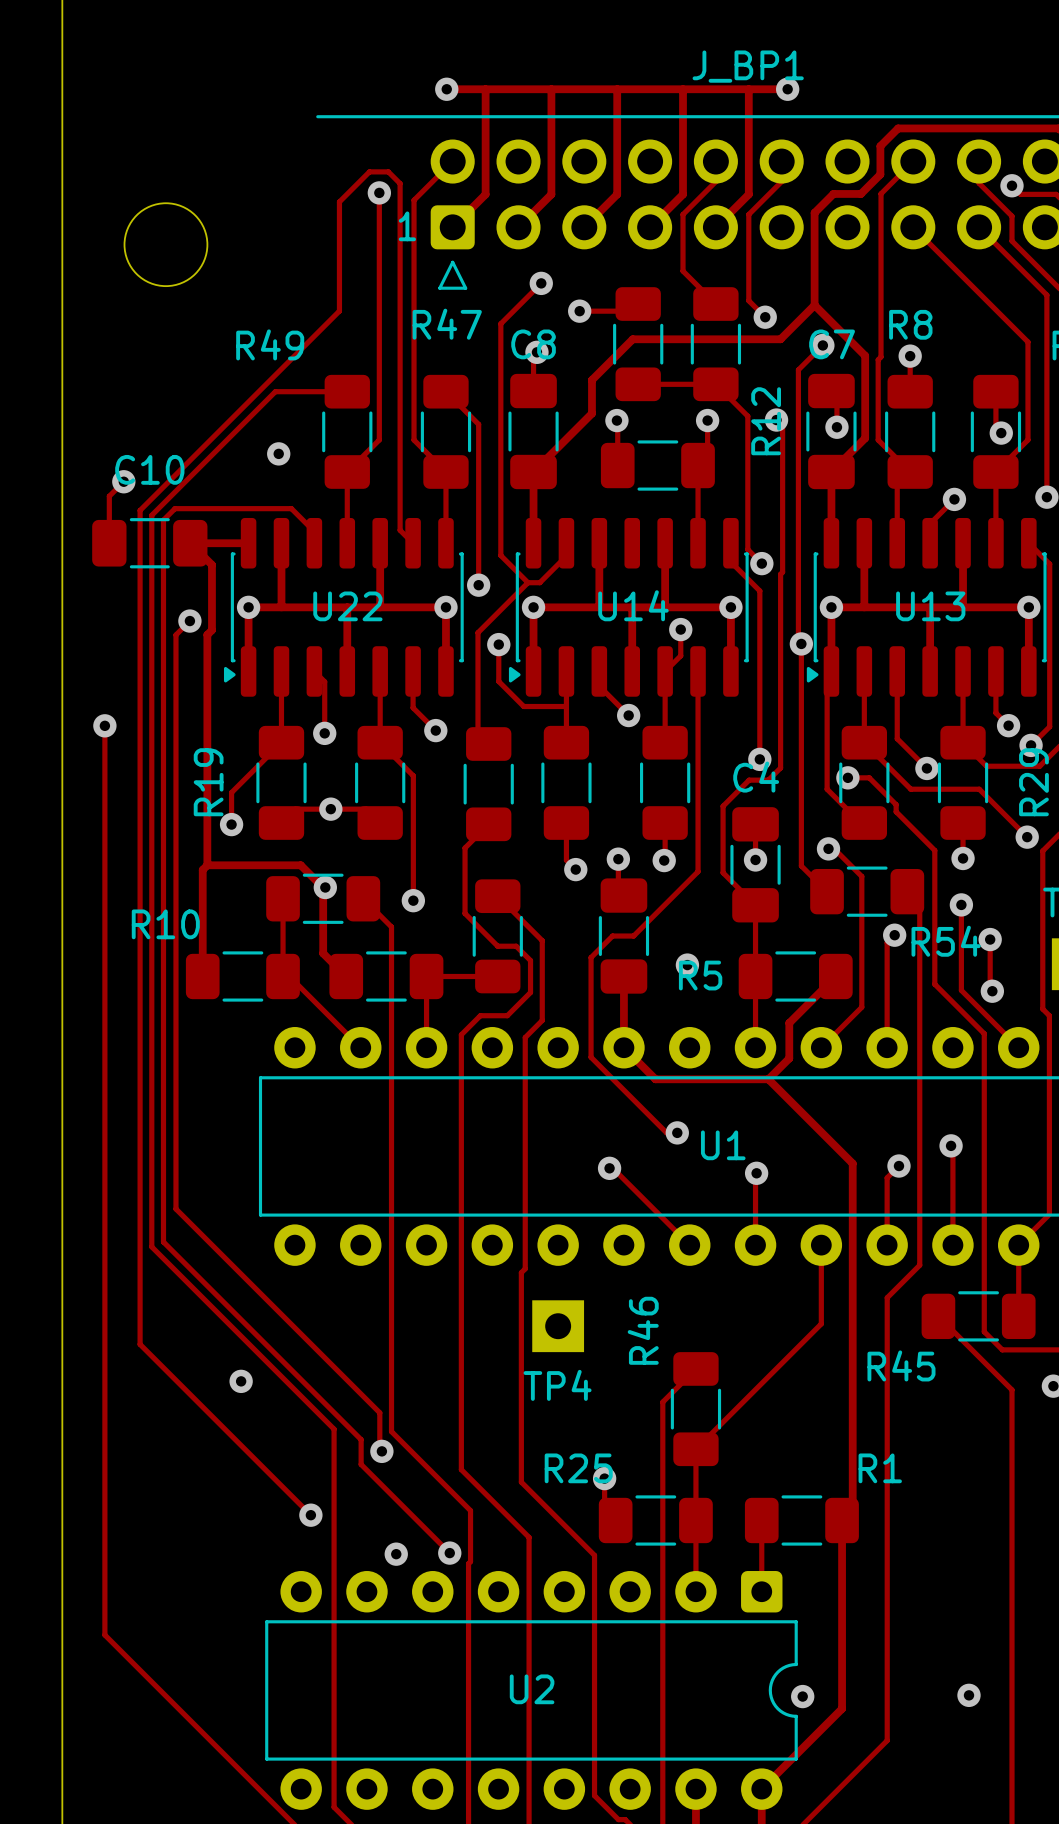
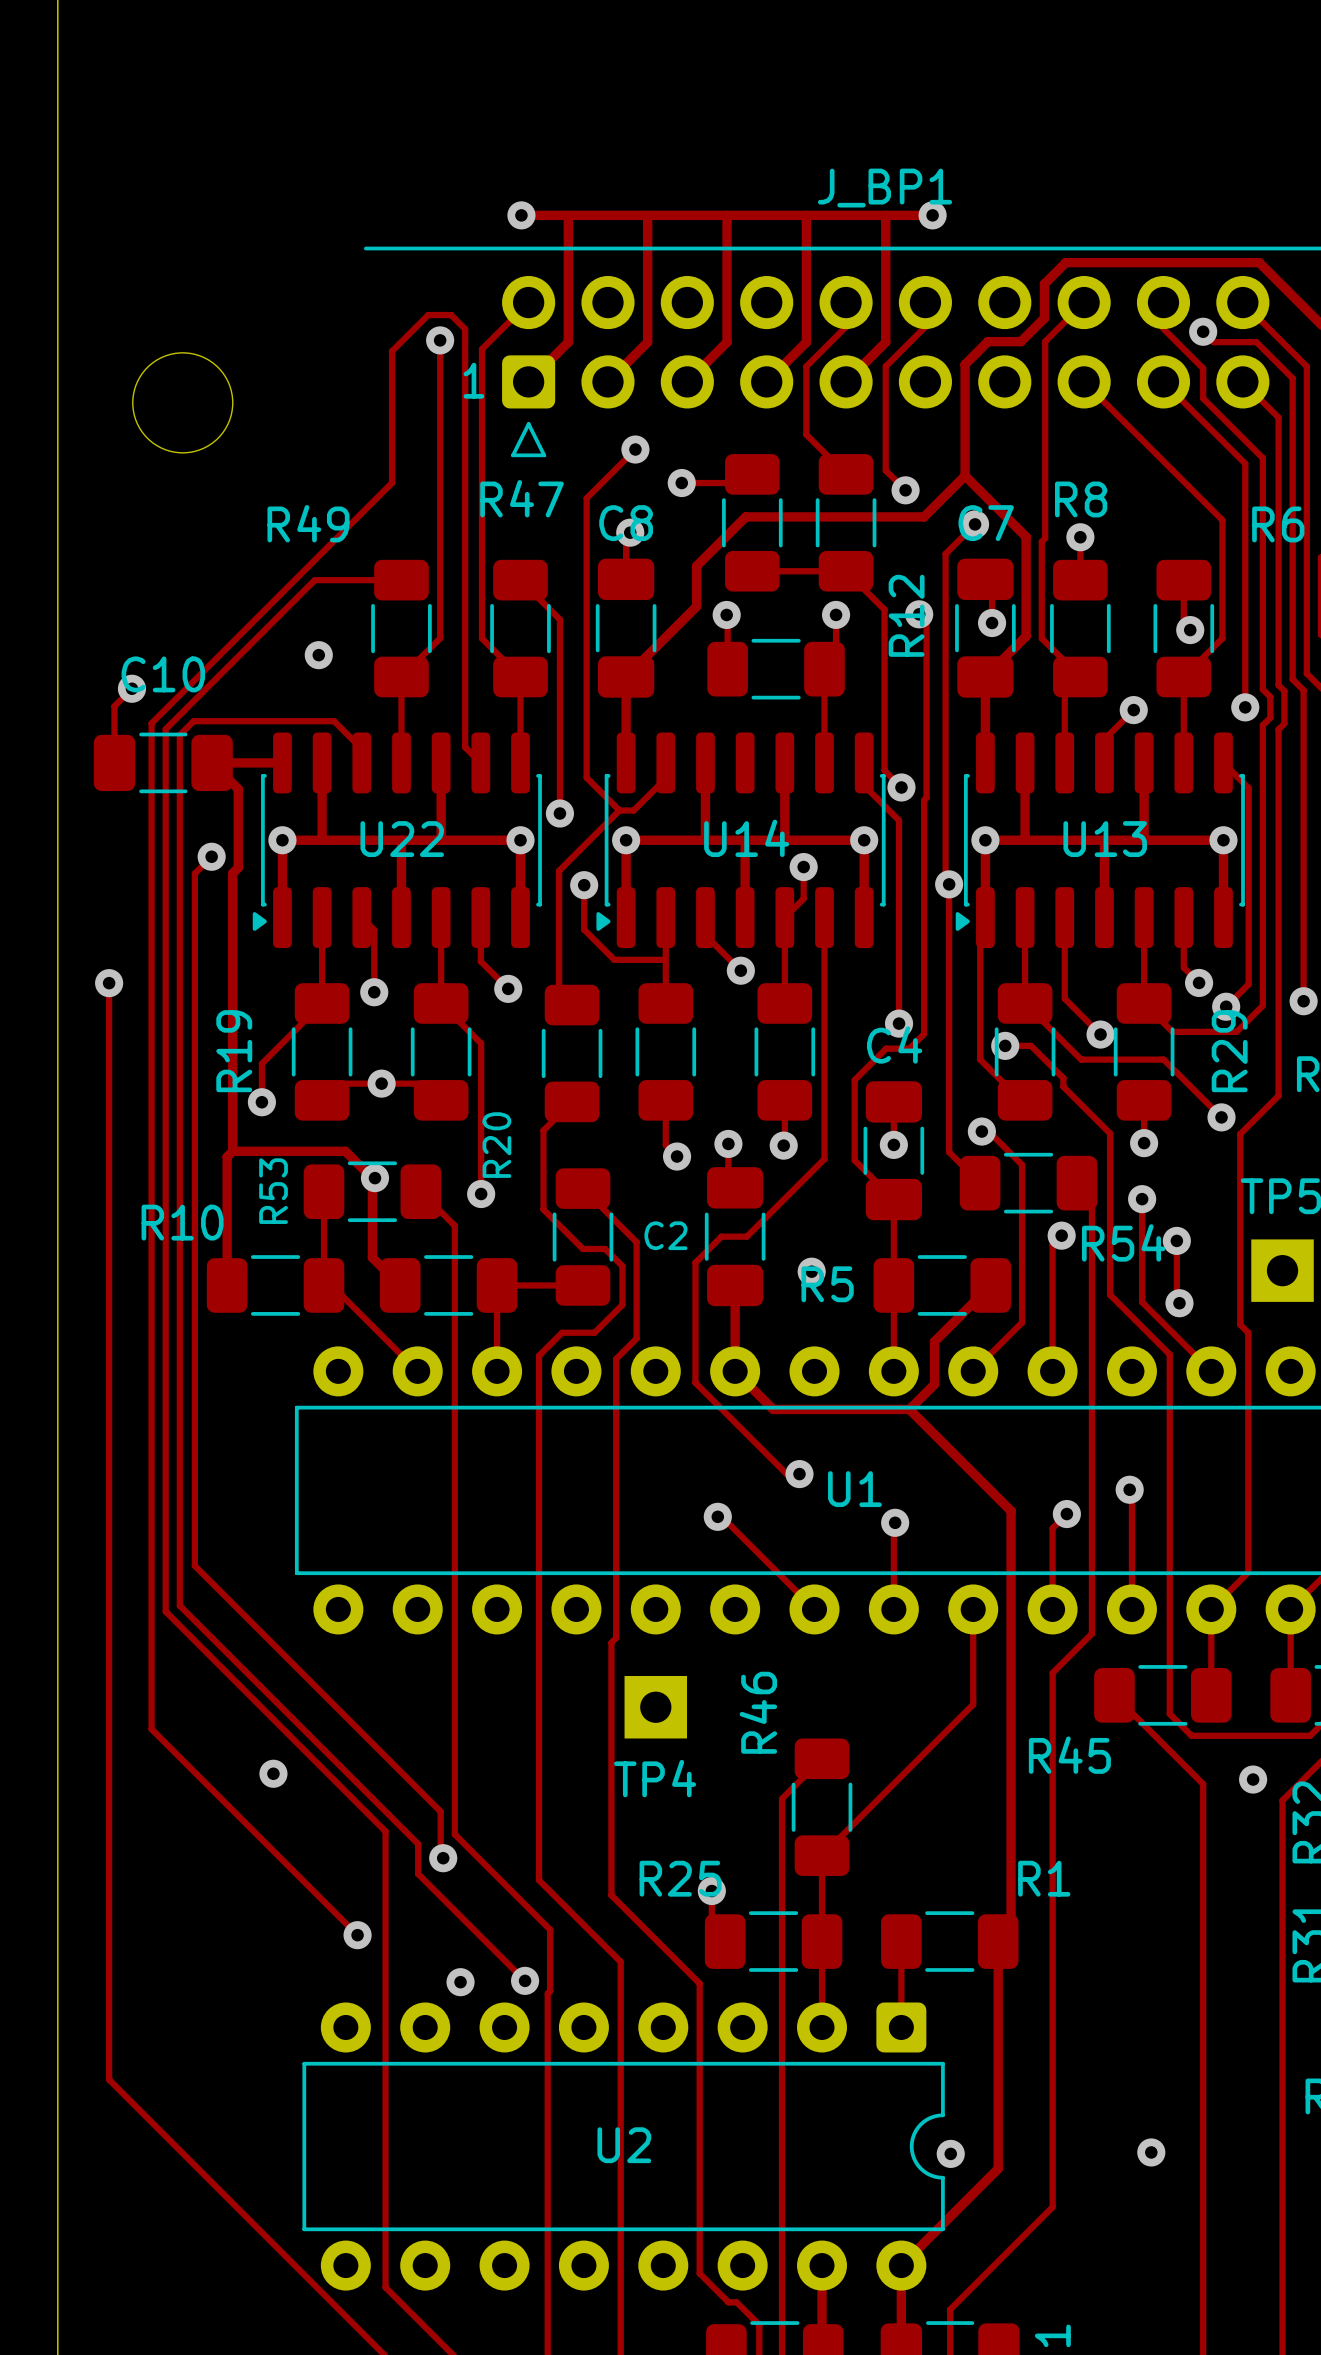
R20 name: none -> R20 (496, 1145)
R53 name: none -> R53 (273, 1191)
C2 name: none -> C2 (665, 1235)

